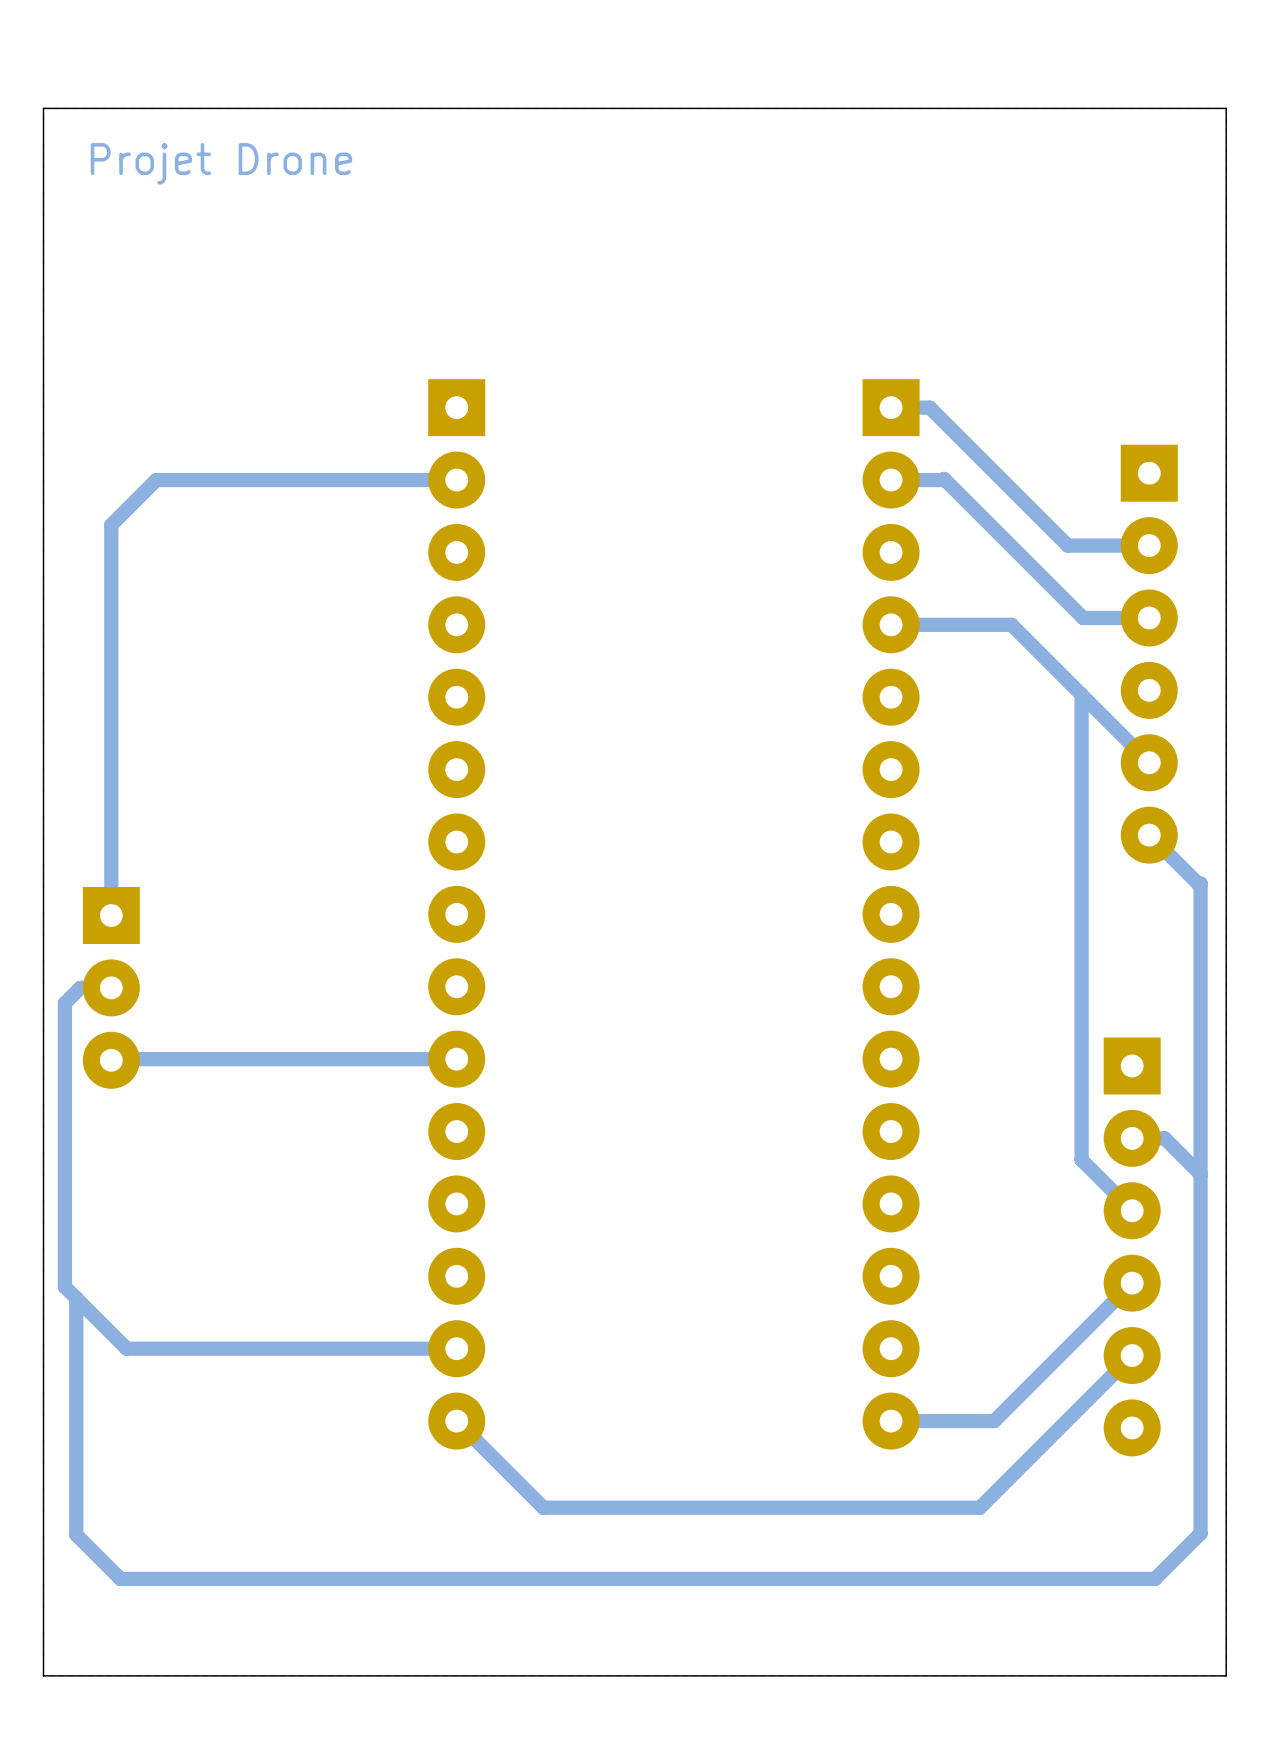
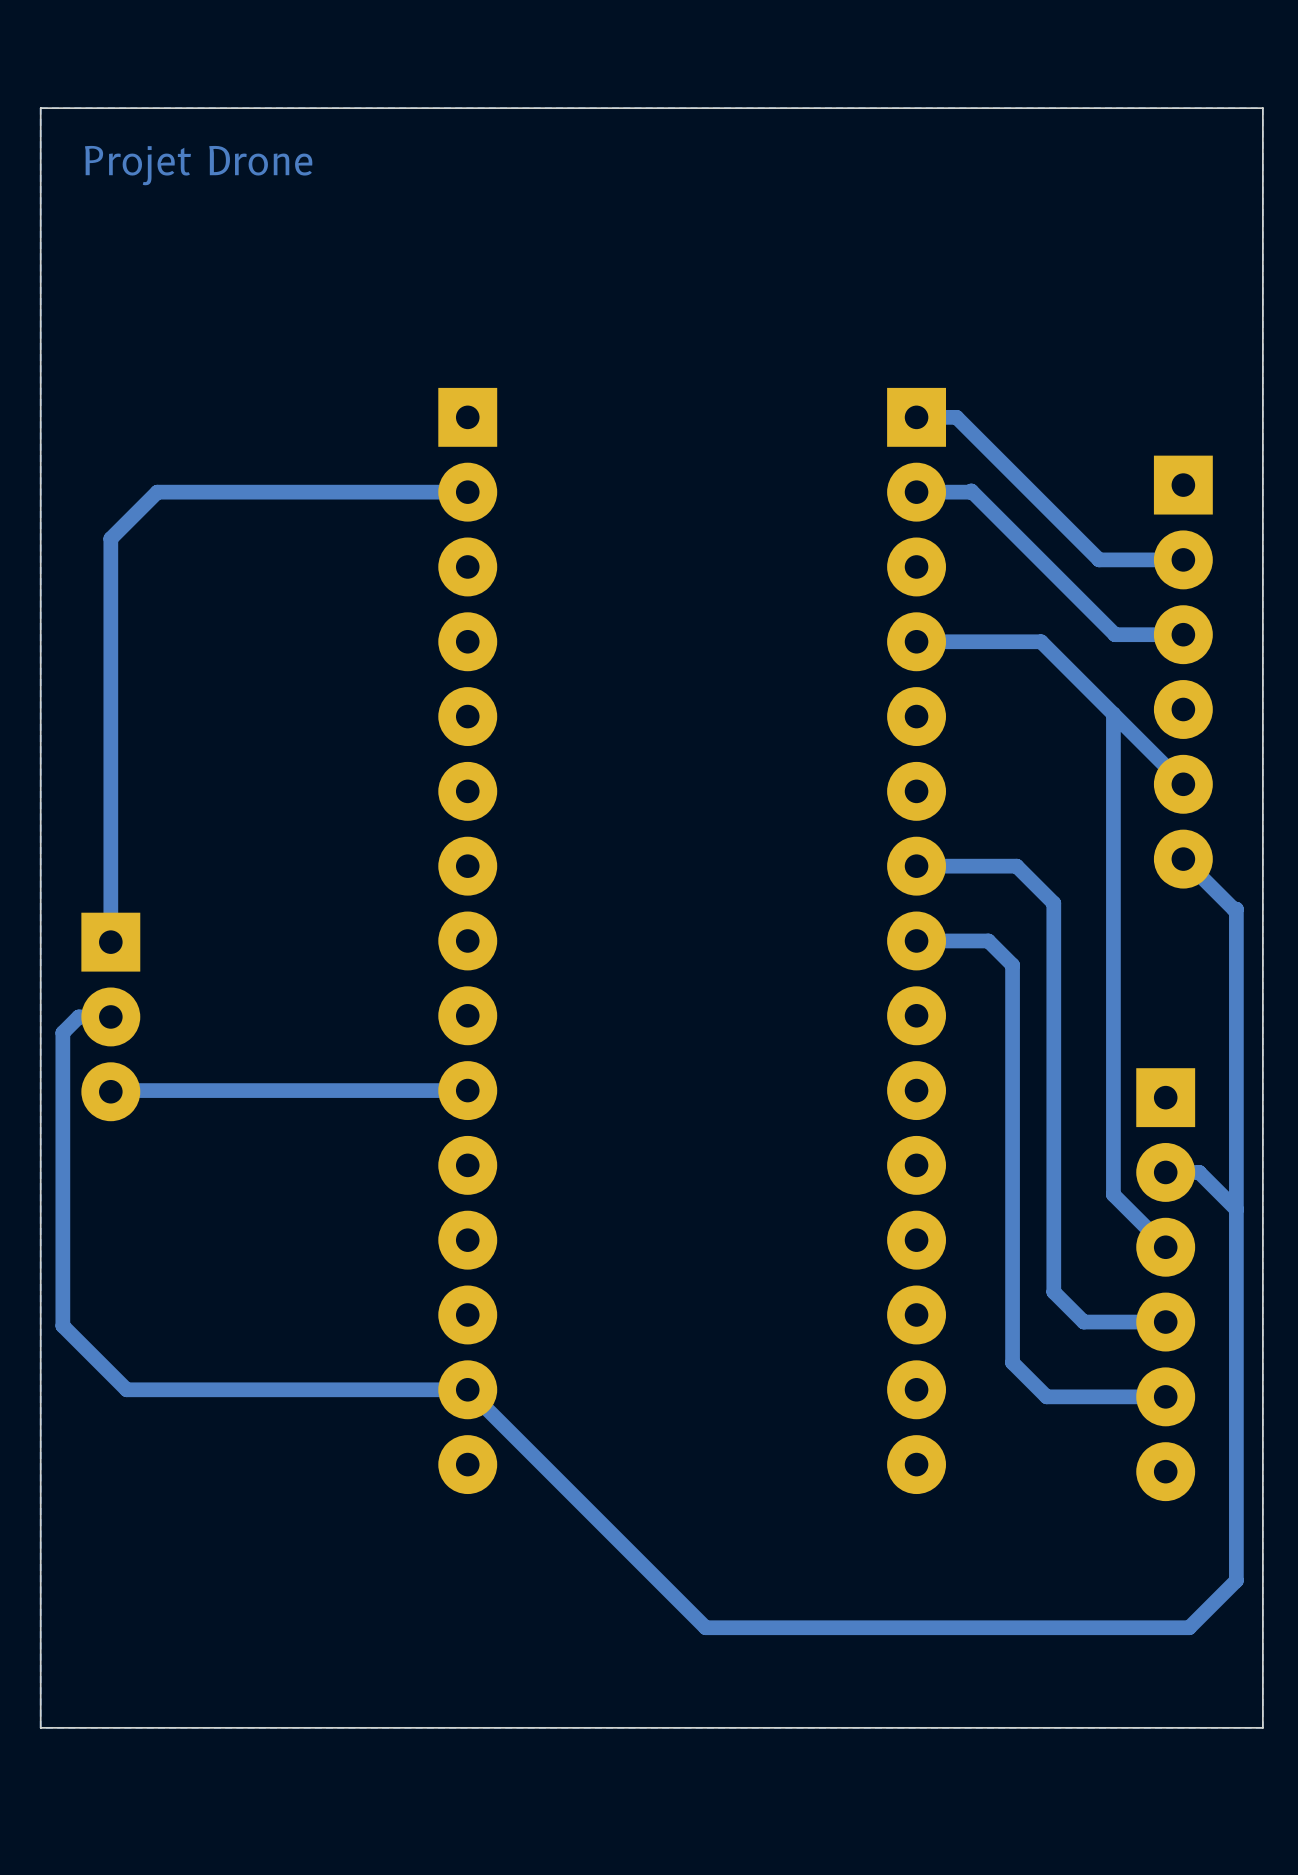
bottom track: (1132, 1283) (994, 1421) (891, 1421) -> (1165, 1322) (1083, 1322) (1053, 1292) (1053, 903) (1016, 866) (916, 866)
bottom track: (76, 1298) (76, 1534) (120, 1578) (687, 1578) -> (467, 1389) (705, 1627)
bottom track: (1132, 1355) (979, 1507) (543, 1507) (456, 1421) -> (1165, 1396) (1046, 1396) (1012, 1362) (1012, 965) (988, 940) (916, 940)

